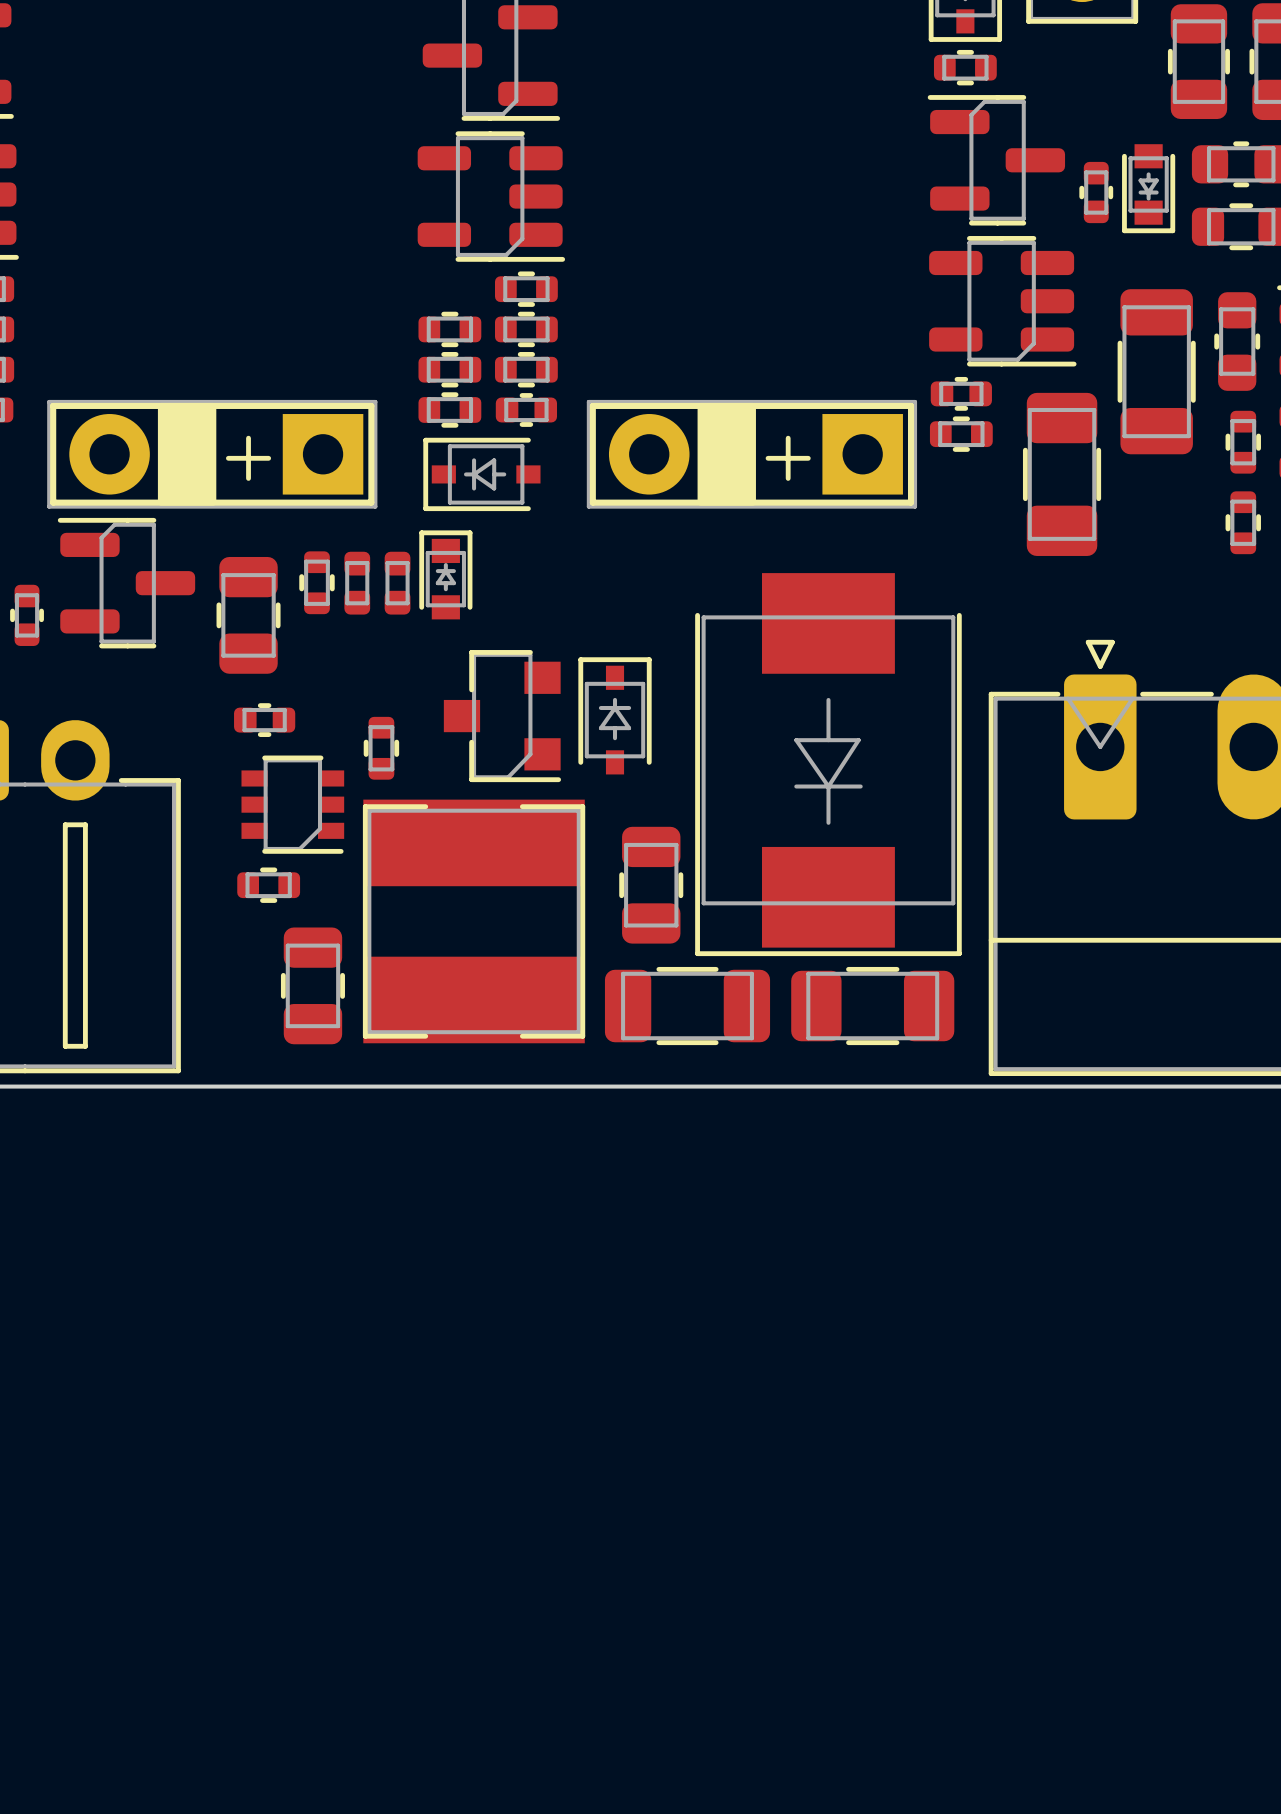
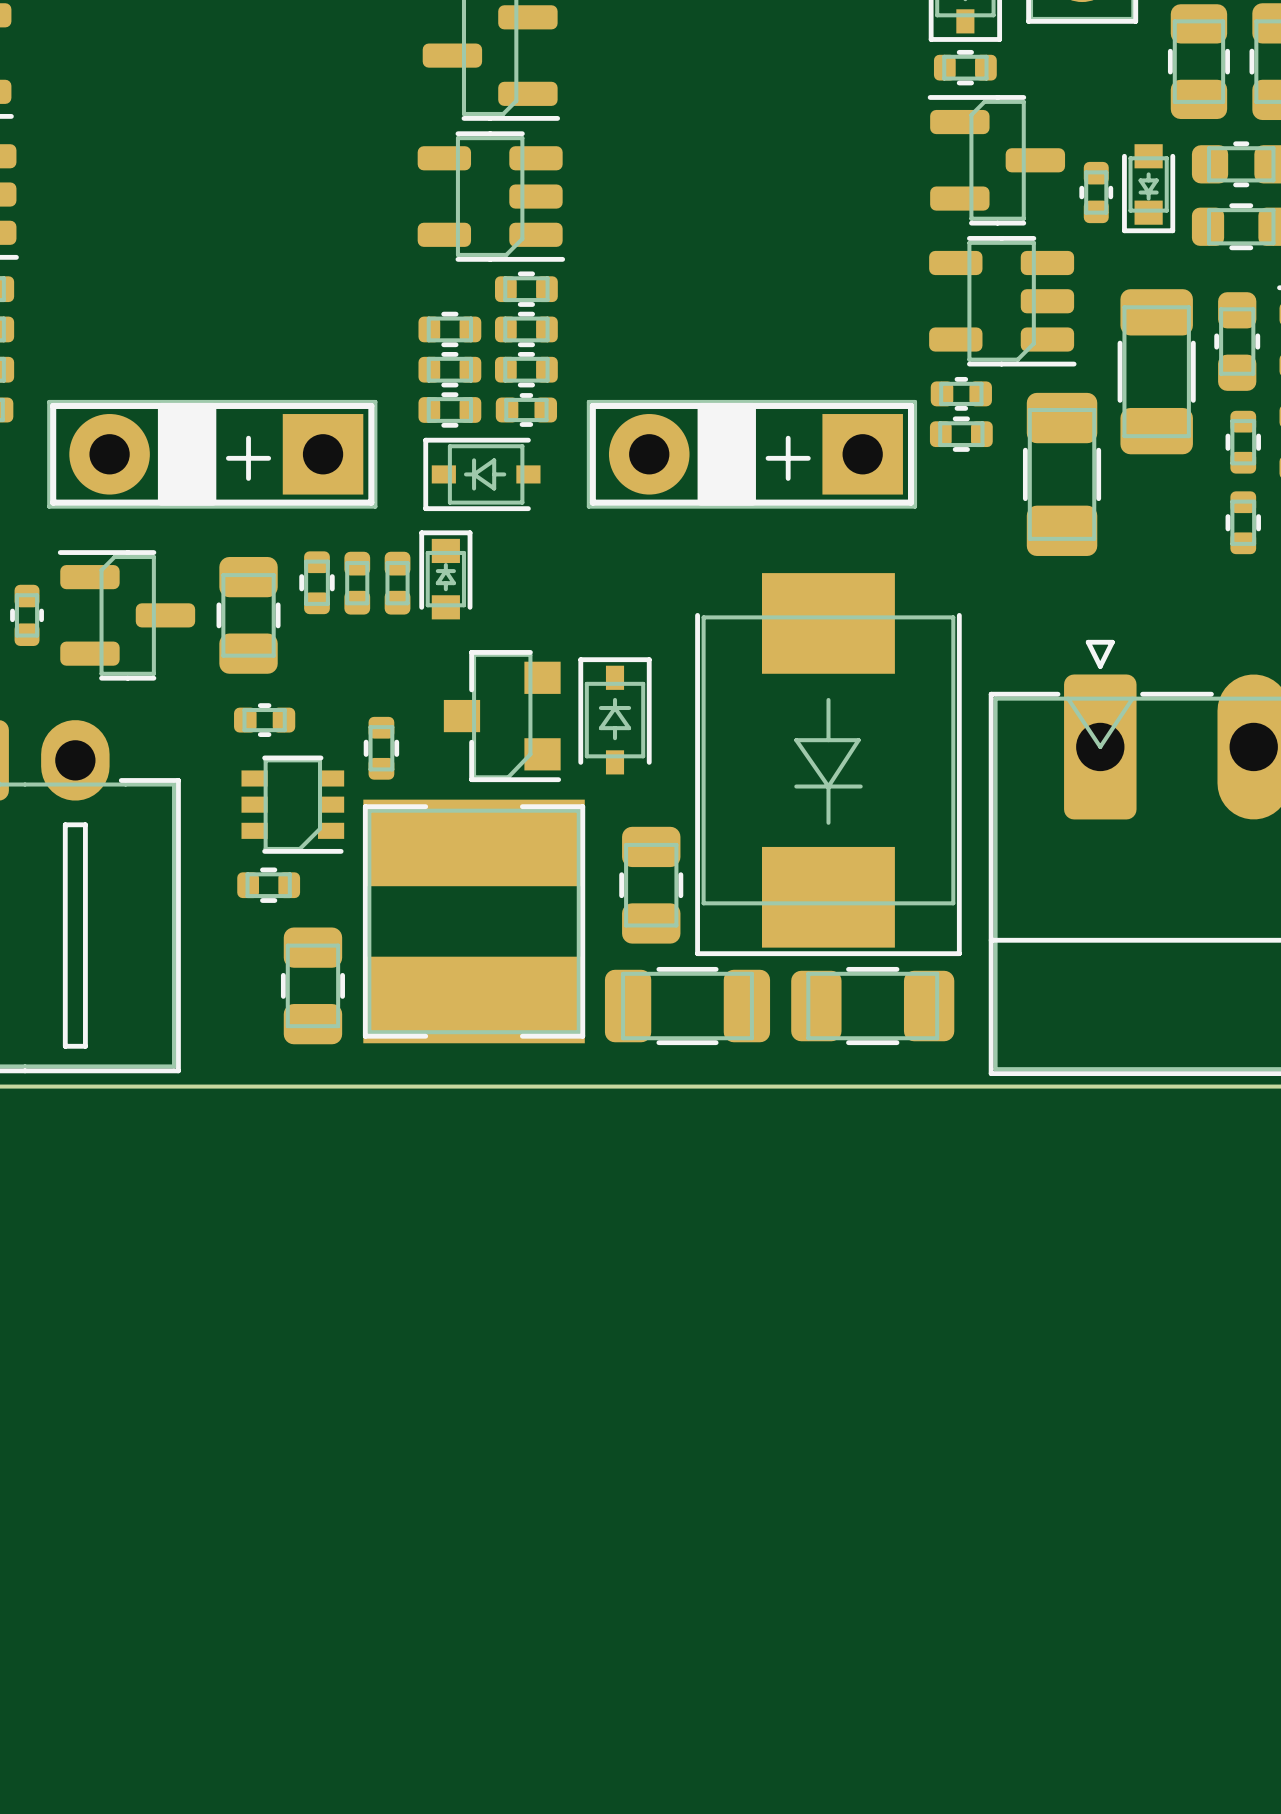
part position: (126, 583) -> (126, 615)

